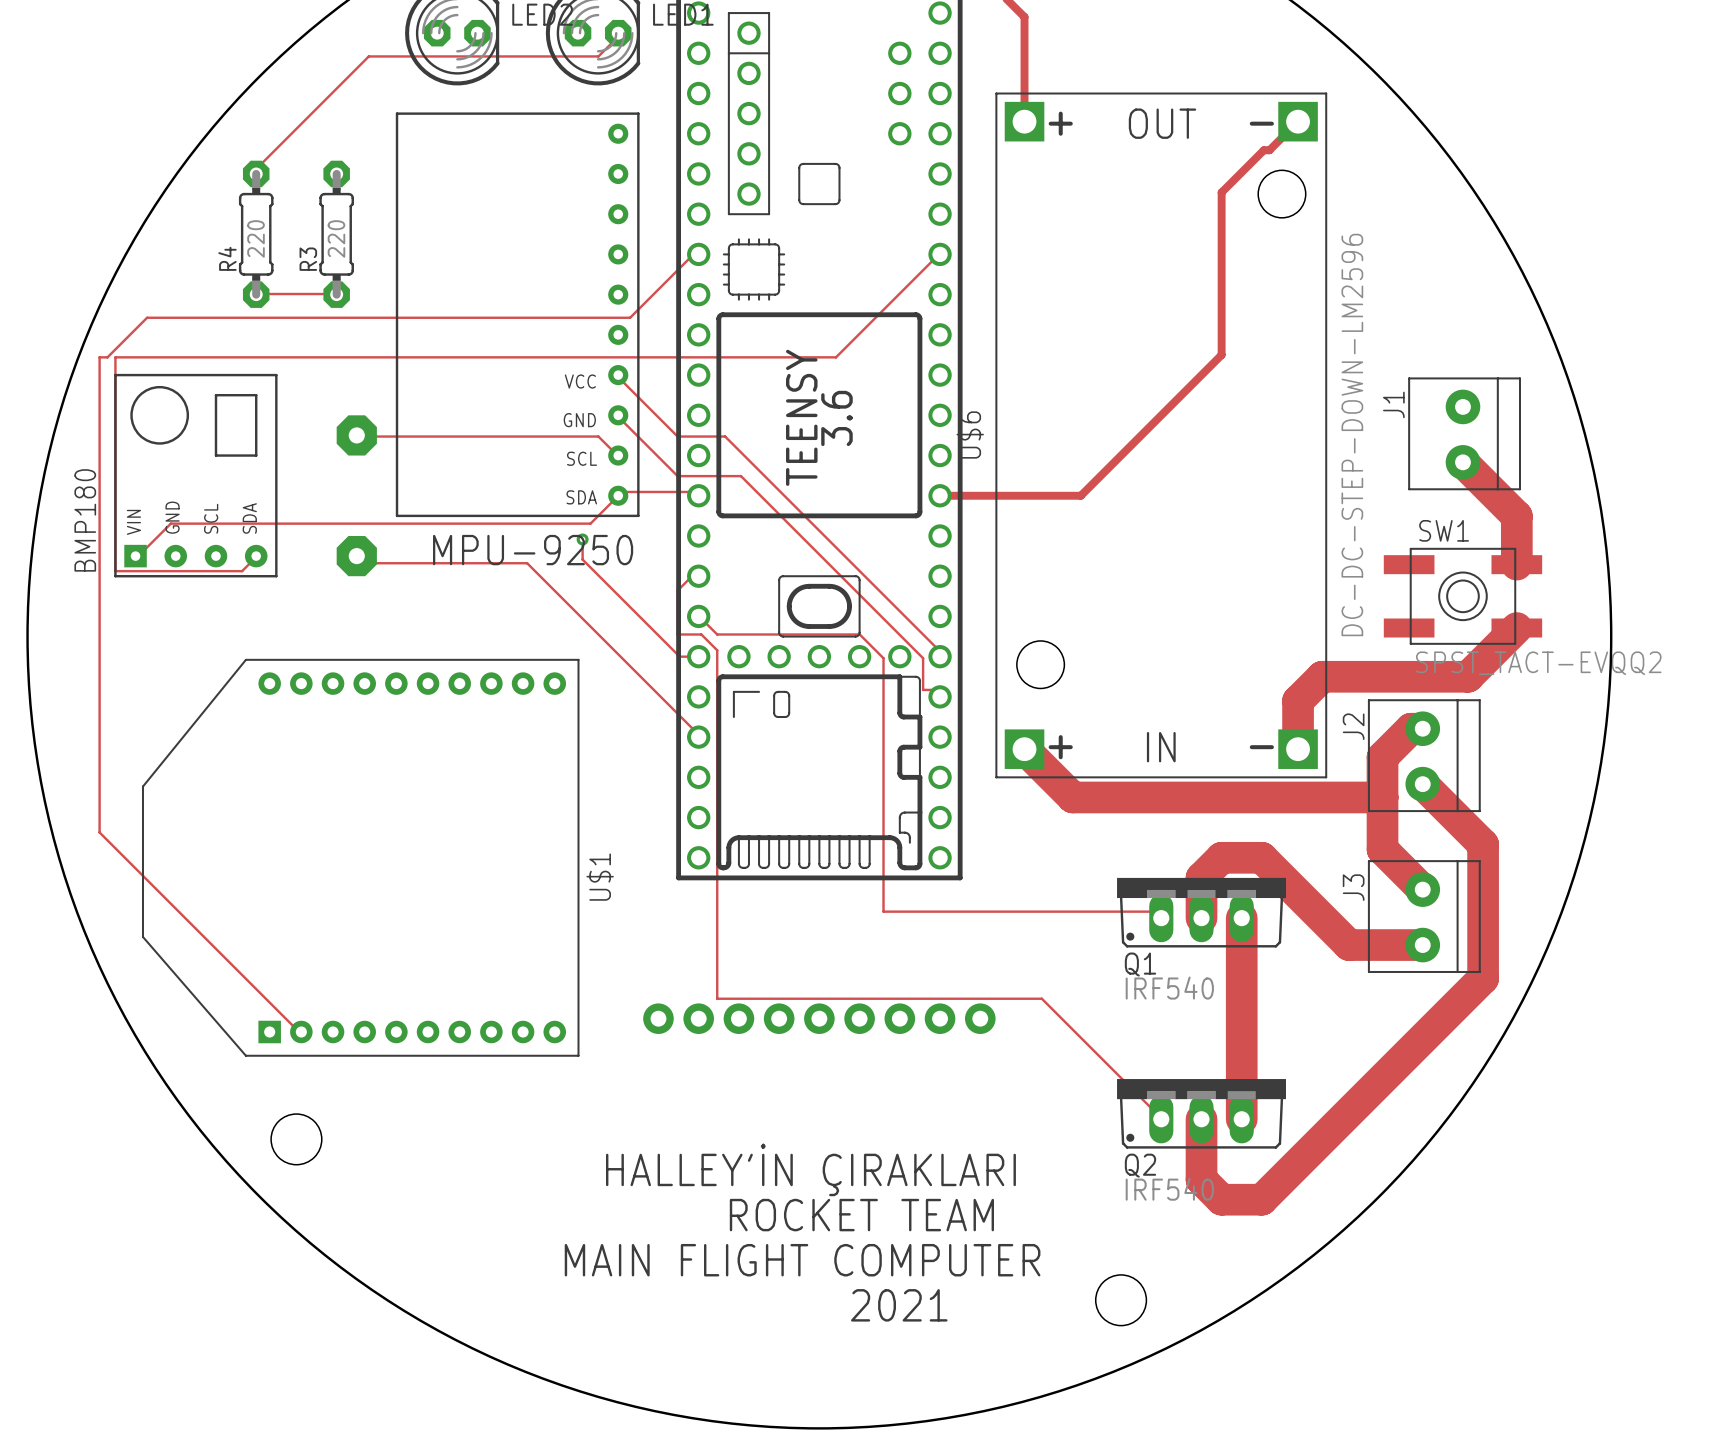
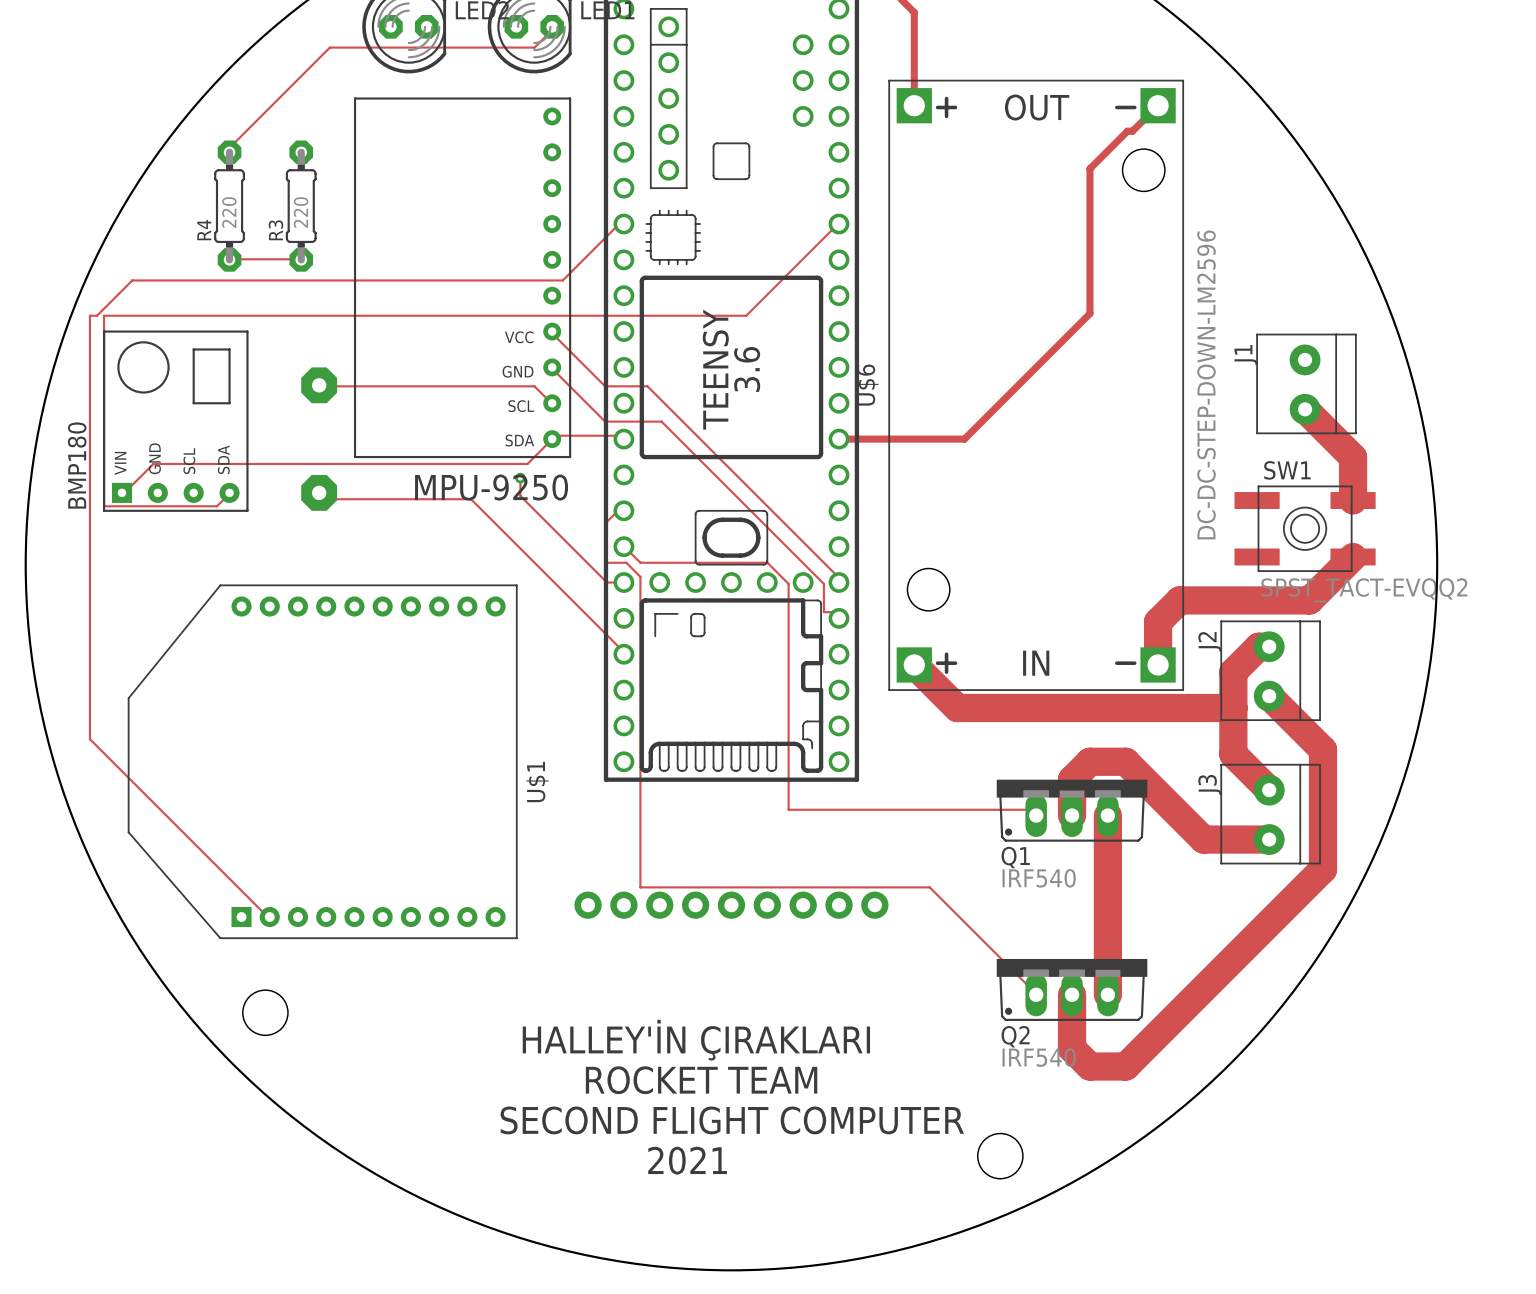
text: MAIN FLIGHT COMPUTER (802, 1260) -> SECOND FLIGHT COMPUTER (732, 1120)

